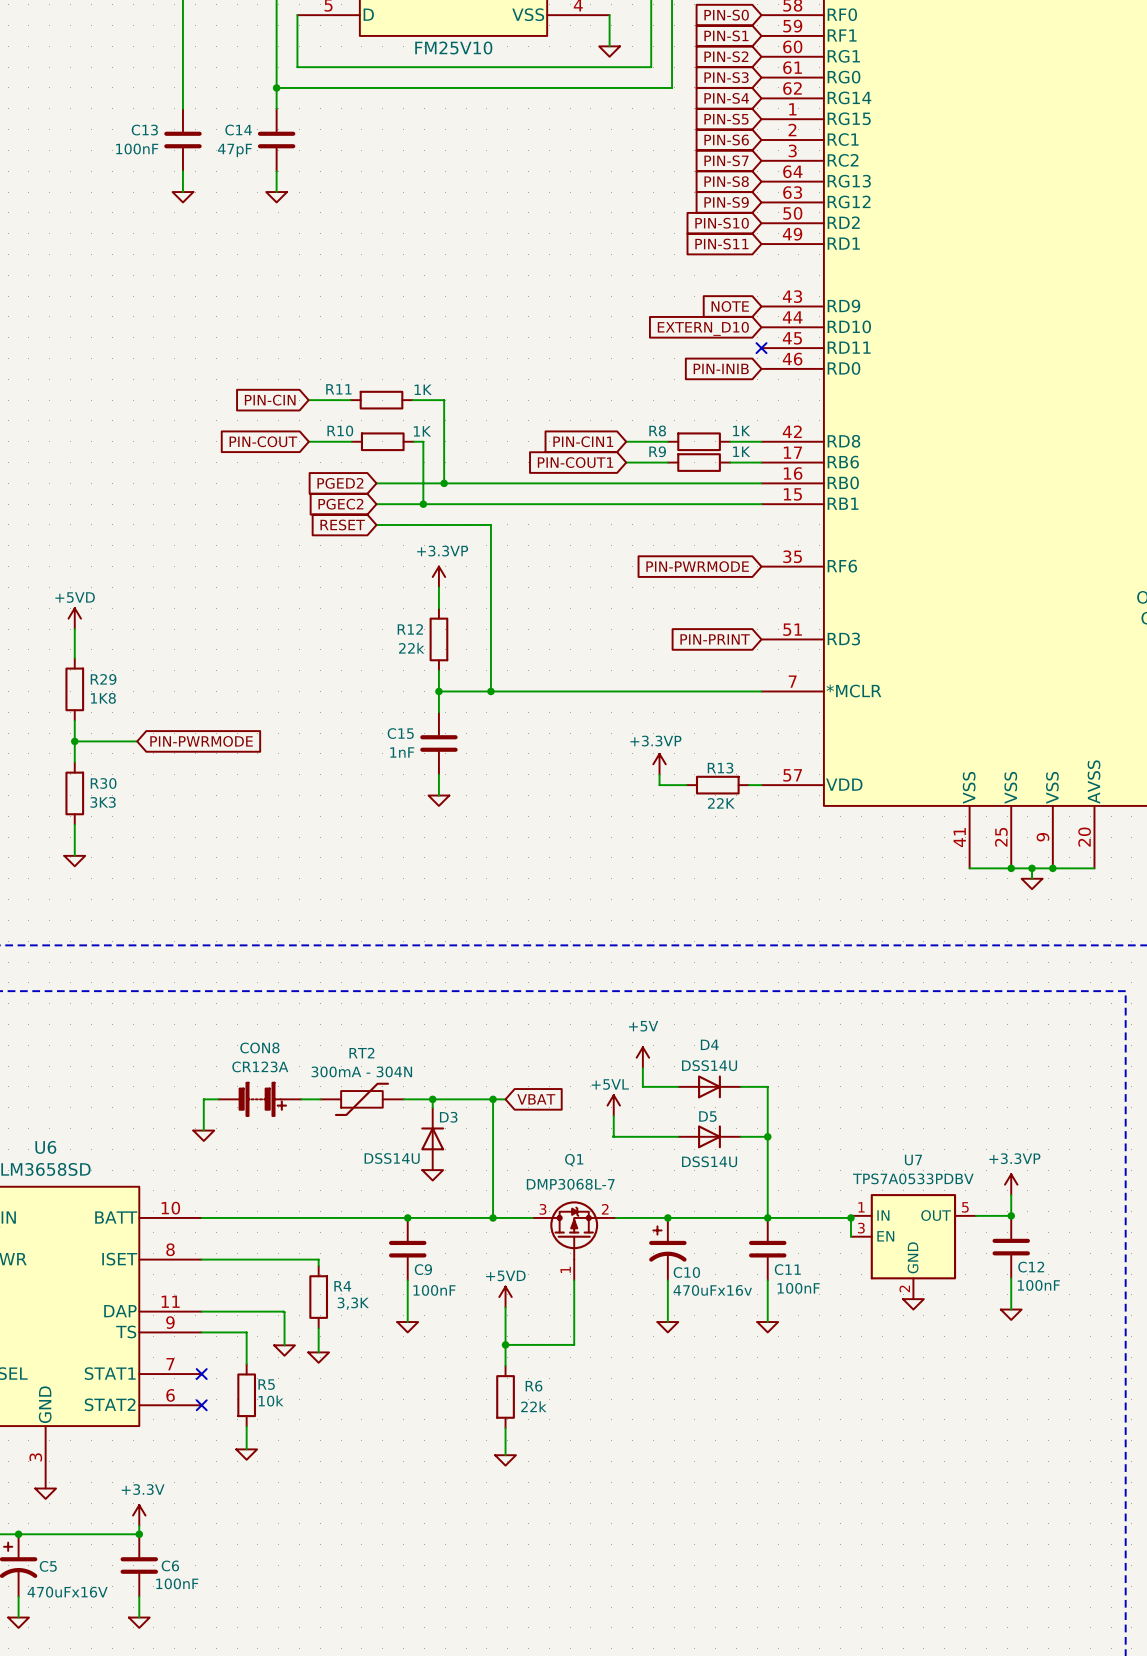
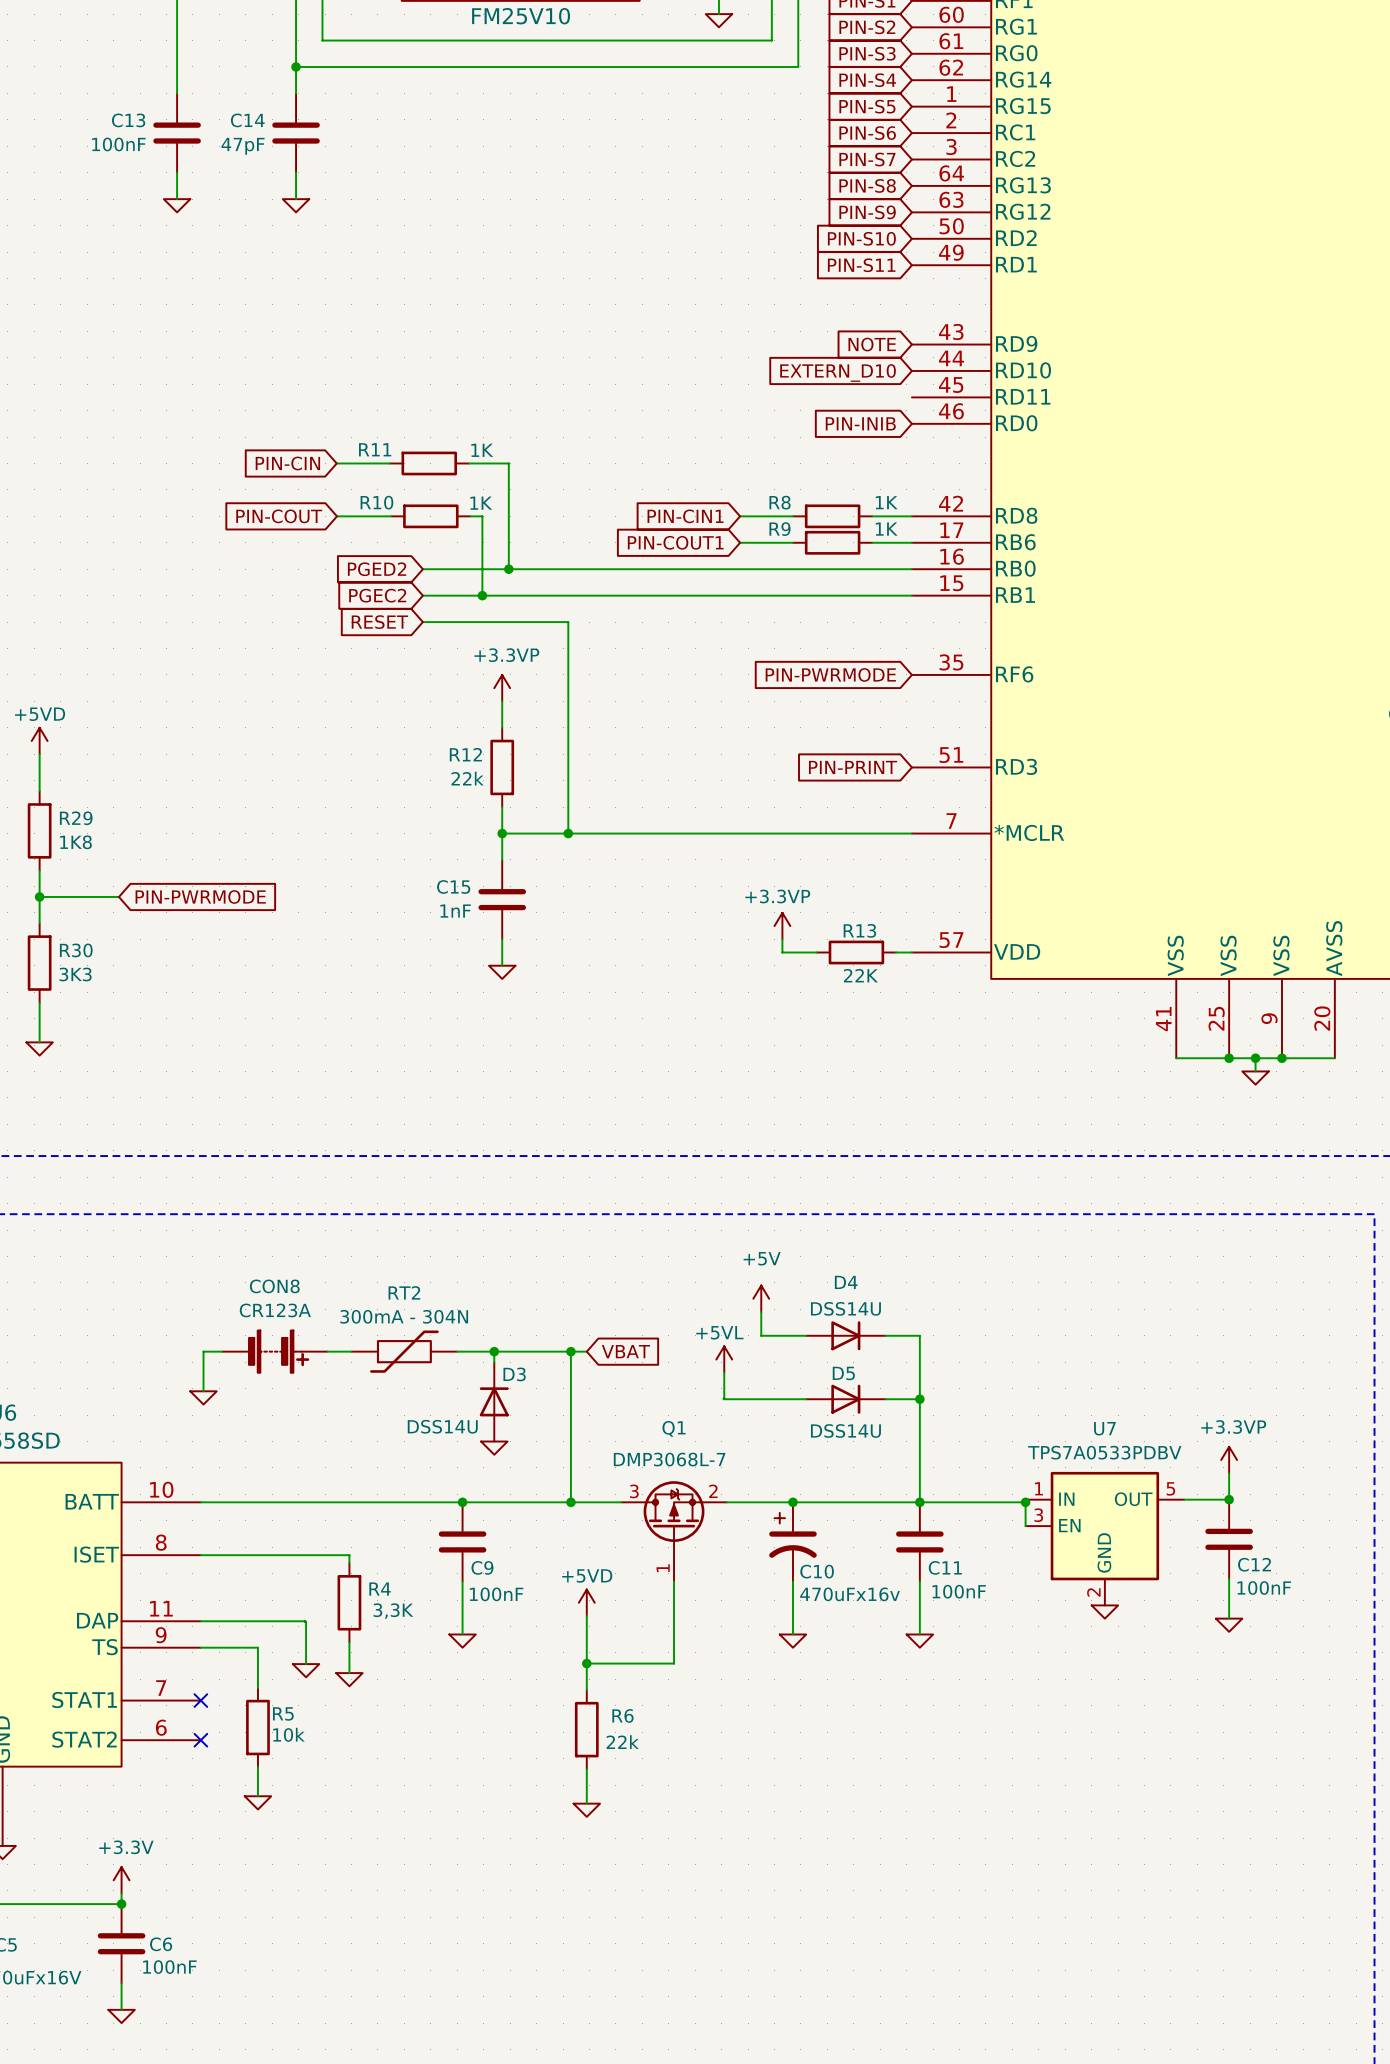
no-connect mark: (761, 348) -> none

